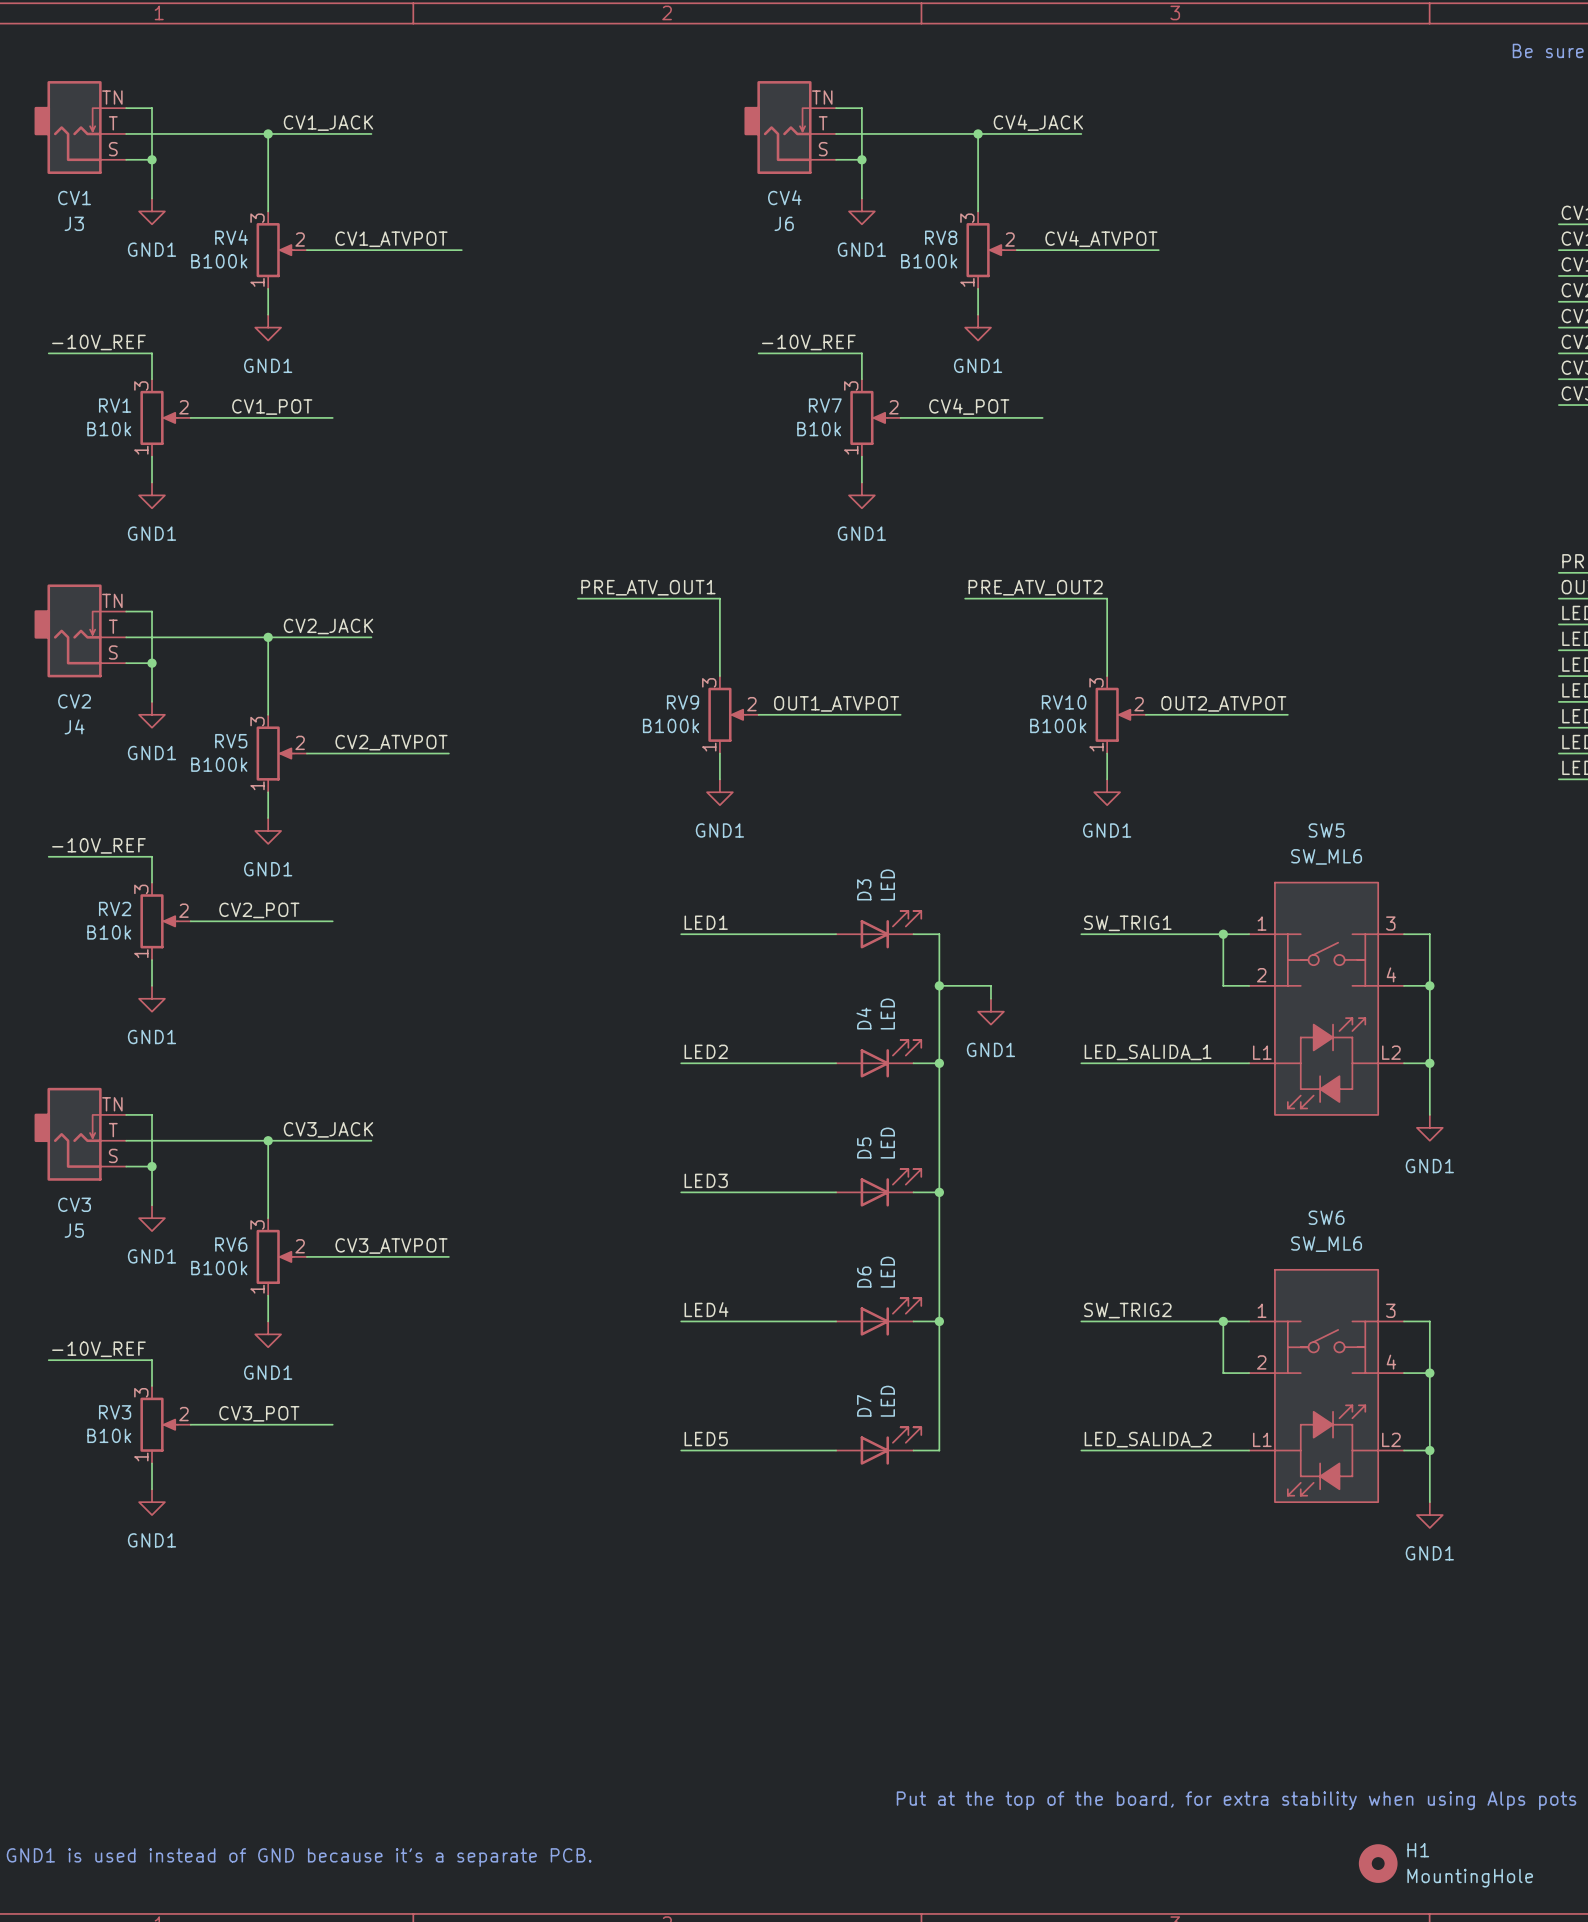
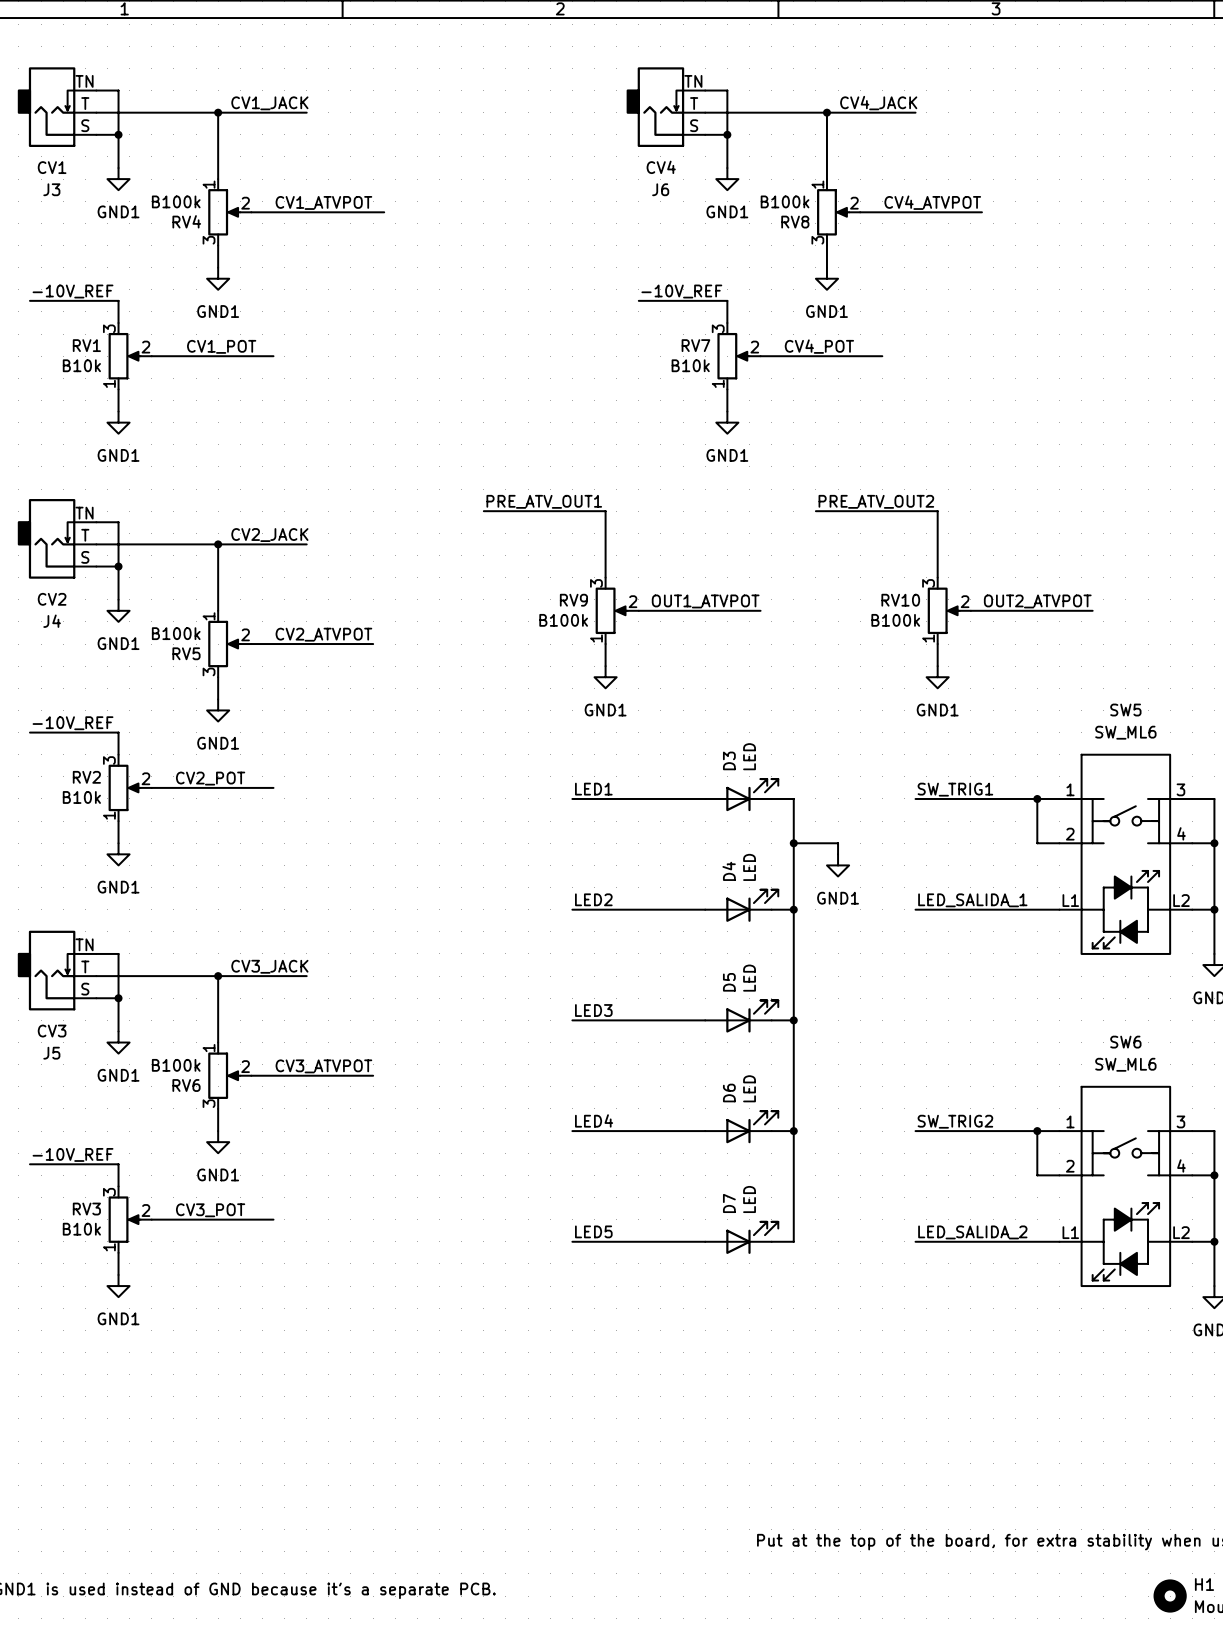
RV4 flip: as is (275, 250) -> up-down (224, 212)
RV8 flip: as is (985, 250) -> up-down (833, 212)
RV5 flip: as is (275, 753) -> up-down (224, 644)
RV6 flip: as is (275, 1256) -> up-down (224, 1075)

